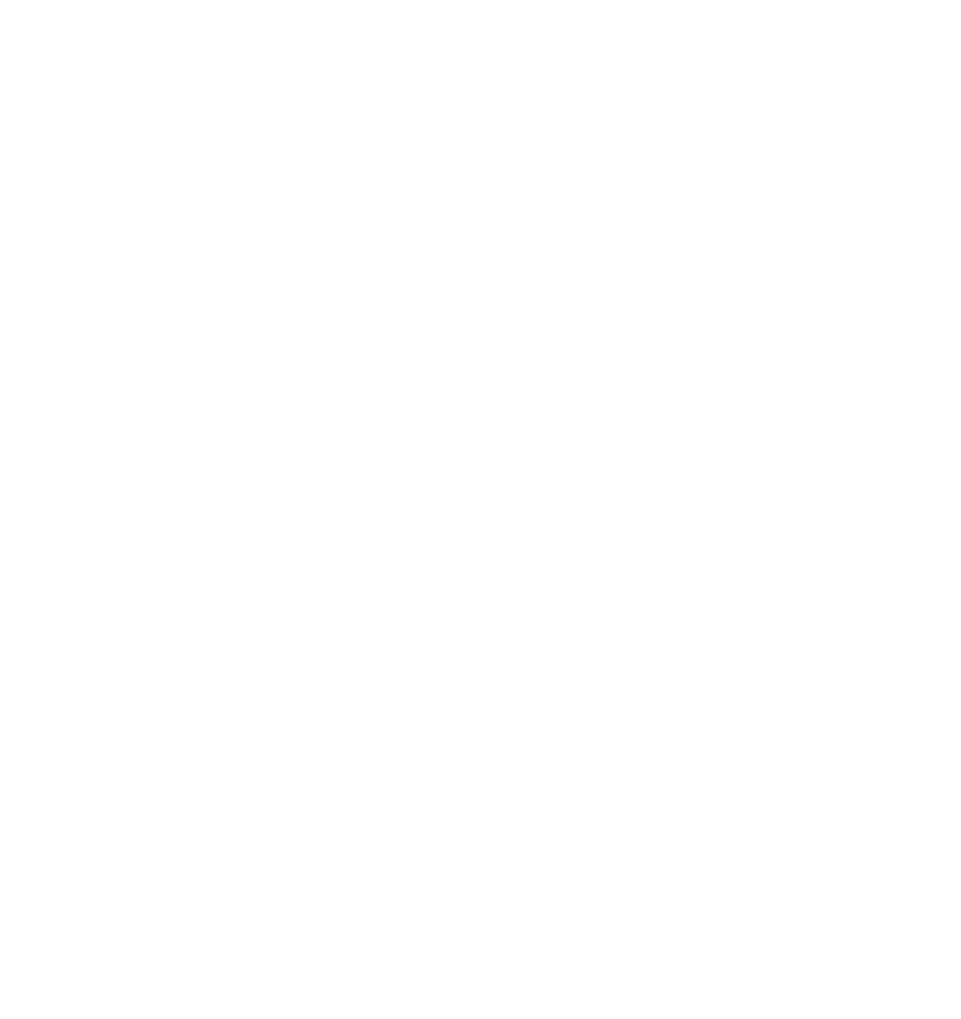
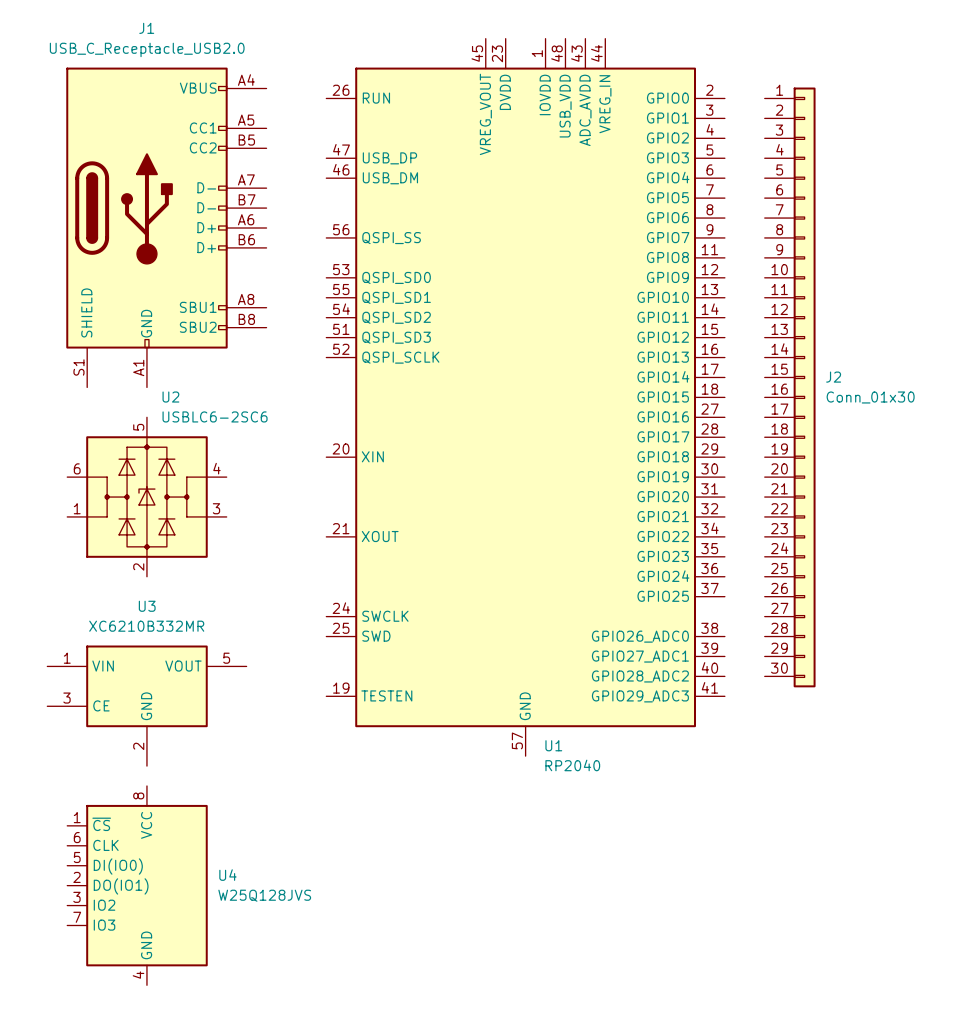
J1: none -> USB_C_Receptacle_USB2.0 (166, 227)
J2: none -> Conn_01x30 (790, 387)
U1: none -> RP2040 (525, 397)
U2: none -> USBLC6-2SC6 (146, 497)
U3: none -> XC6210B332MR (146, 705)
U4: none -> W25Q128JVS (137, 885)

